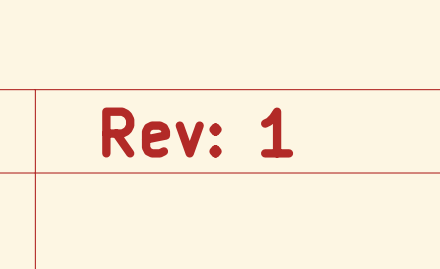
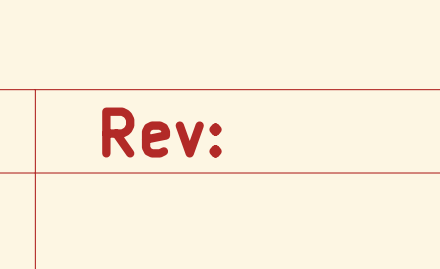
title block: Rev: 1 (197, 132) -> Rev: (161, 132)

